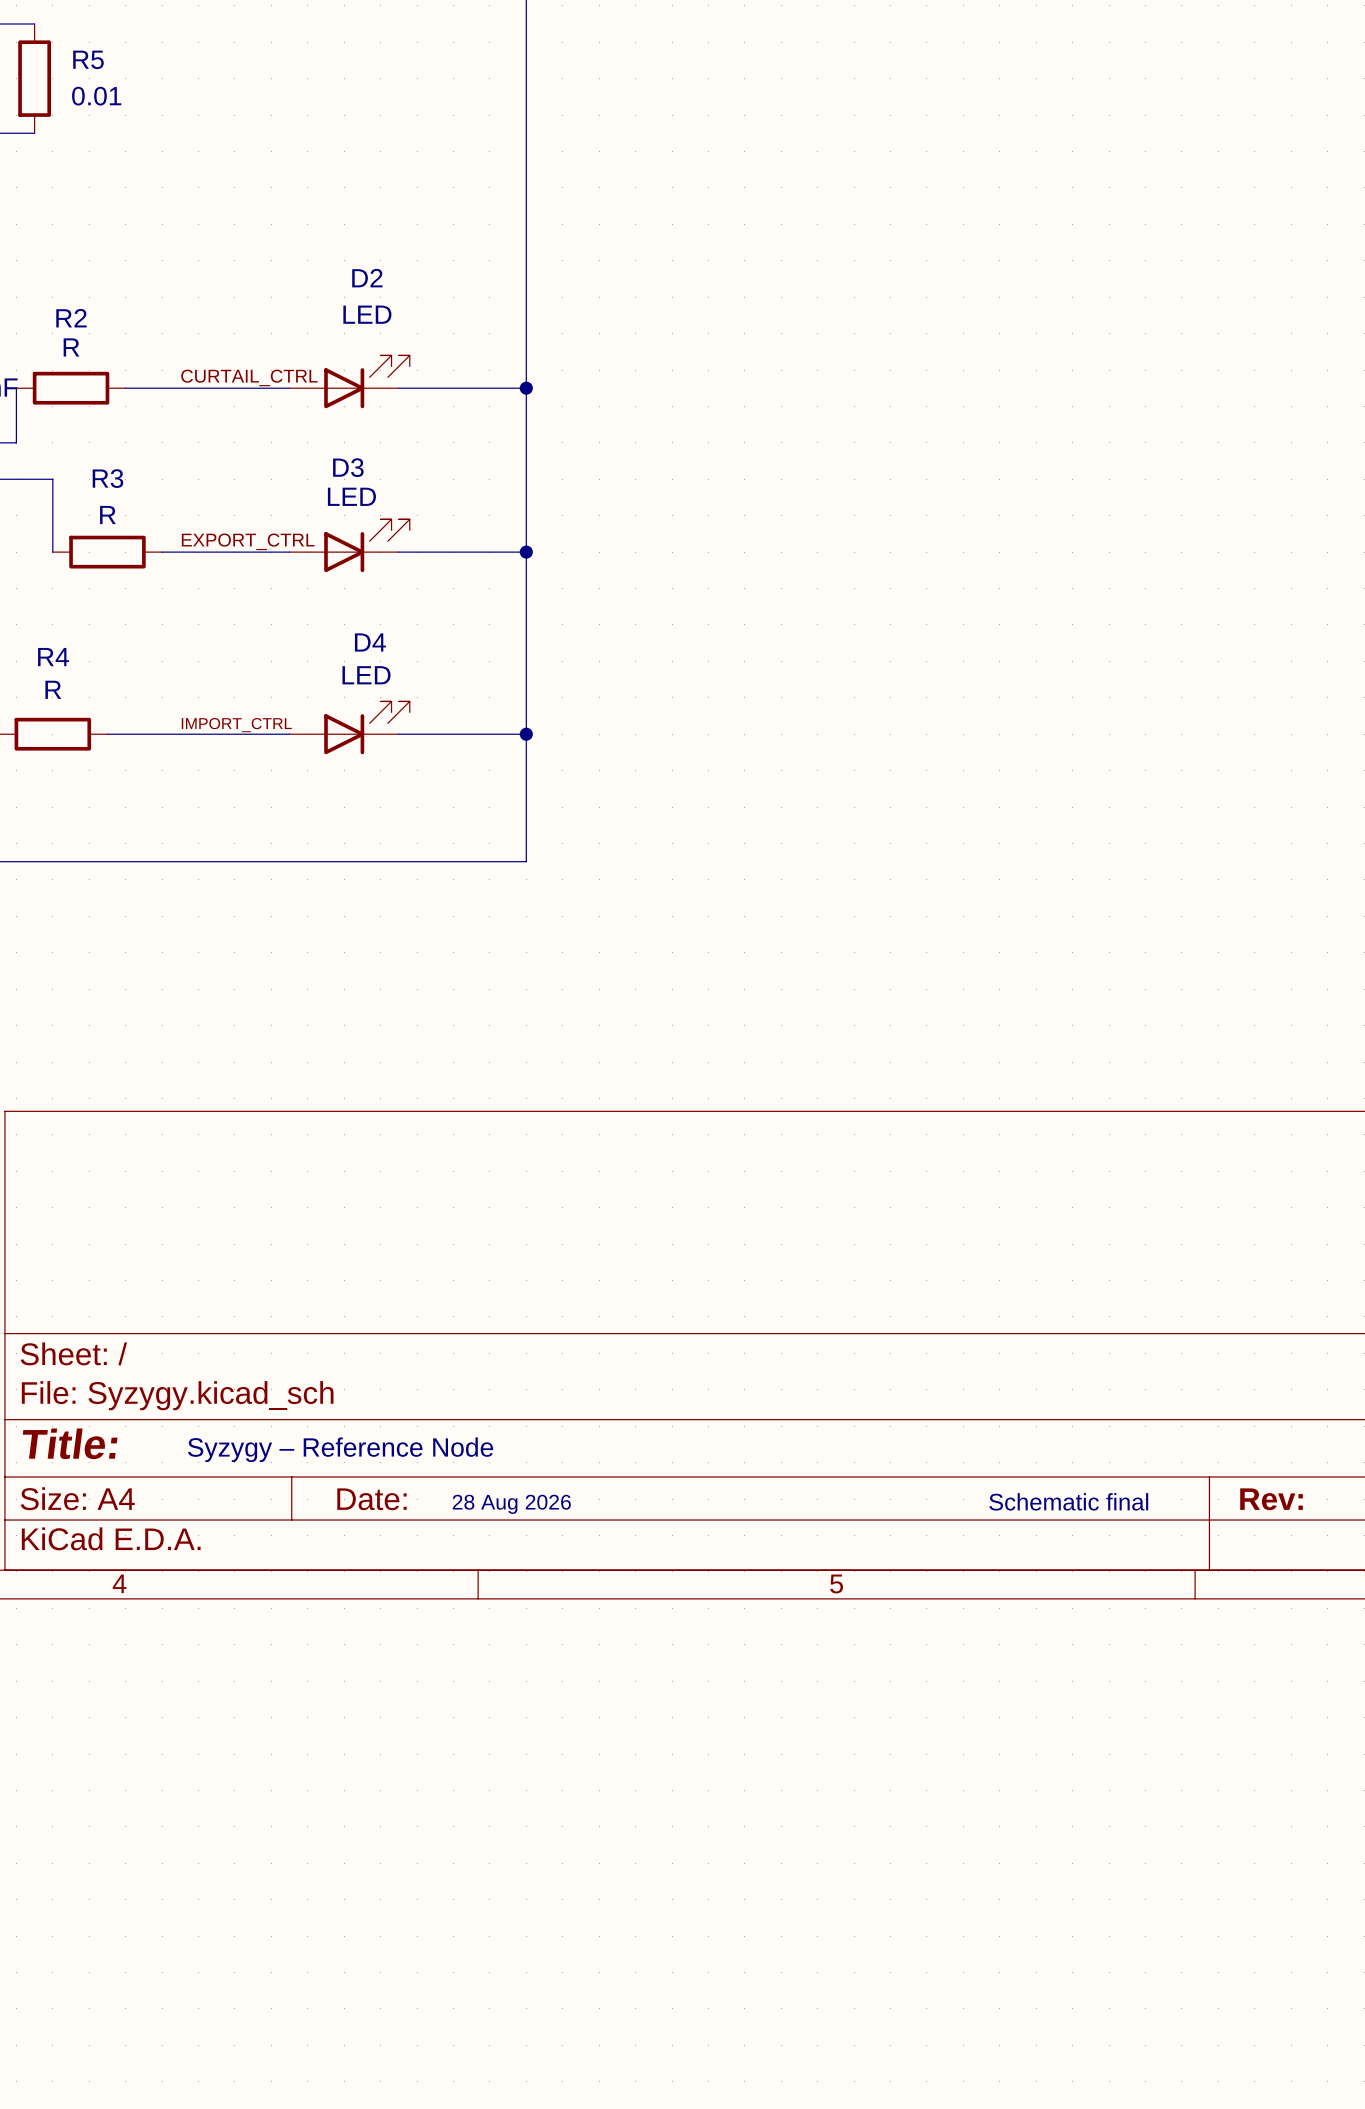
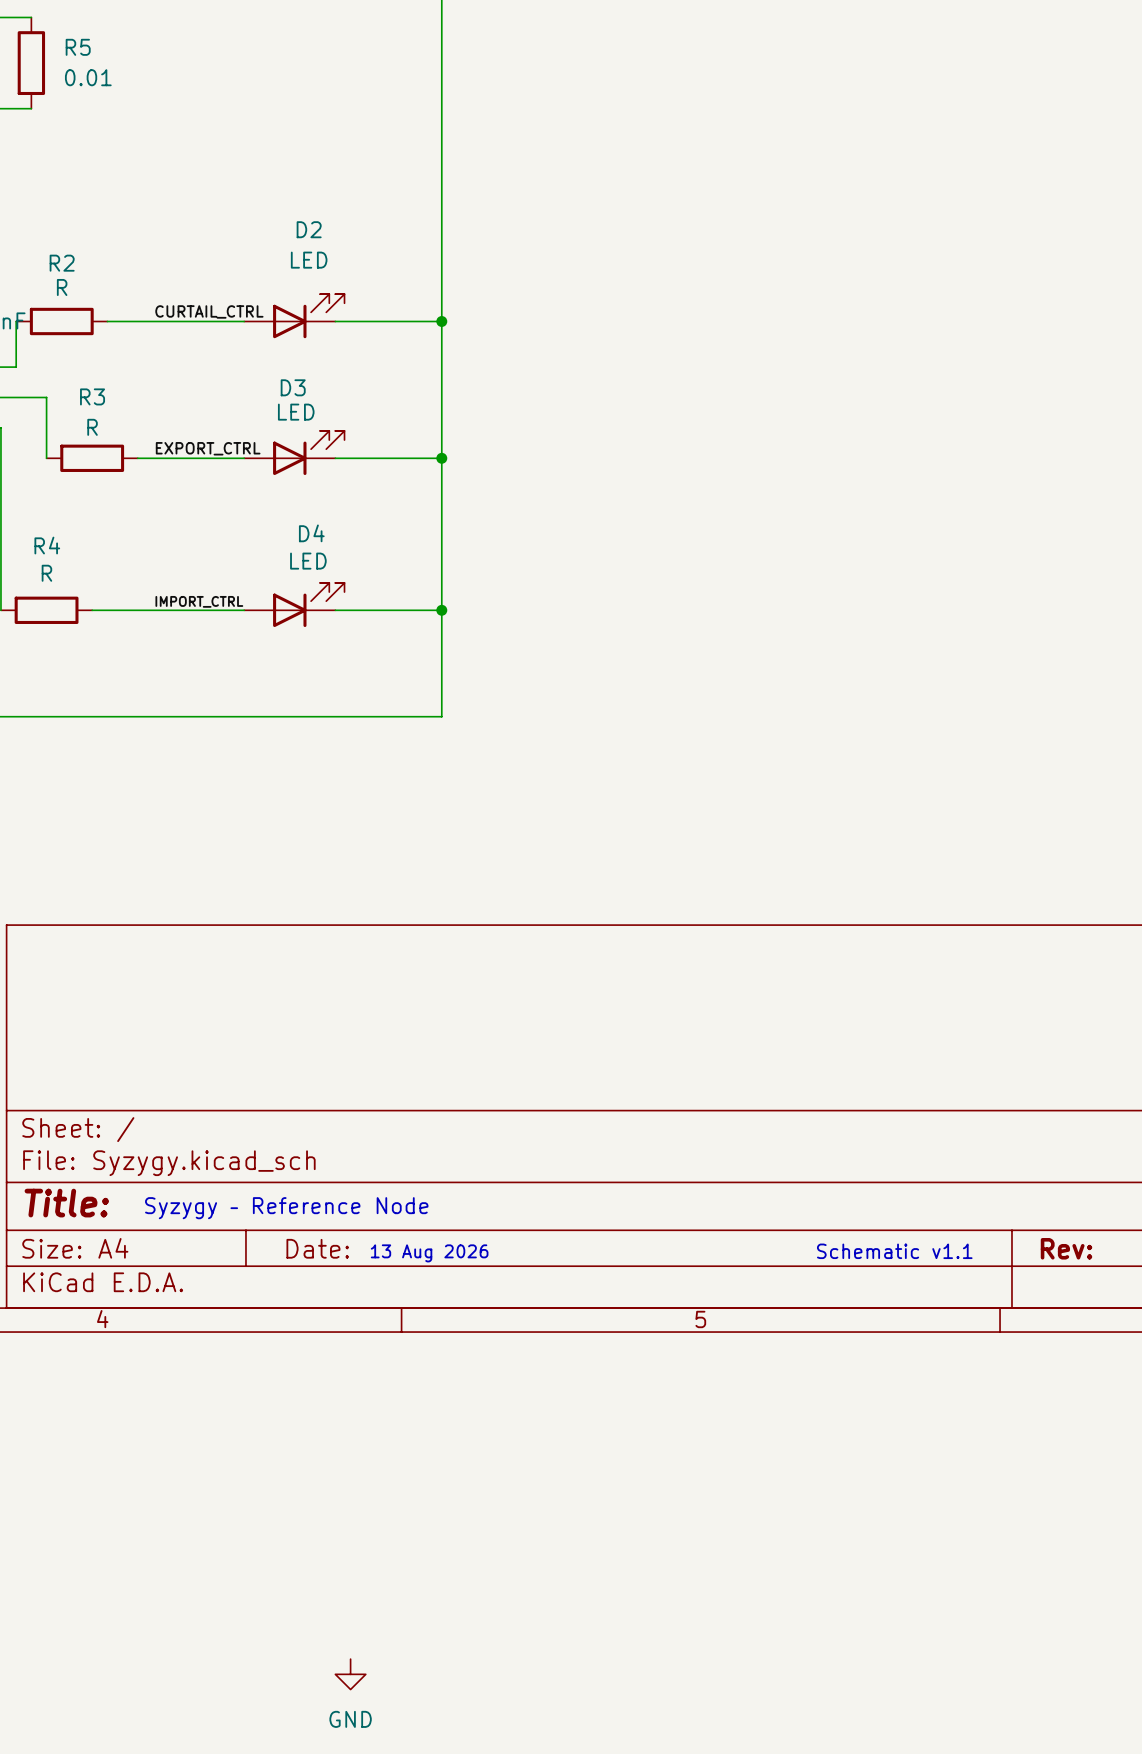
text: Schematic final (1068, 1501) -> Schematic v1.1 (894, 1251)
text: 28 Aug 2026 (511, 1504) -> 13 Aug 2026 (429, 1253)
power symbol: none -> GND (350, 1674)

